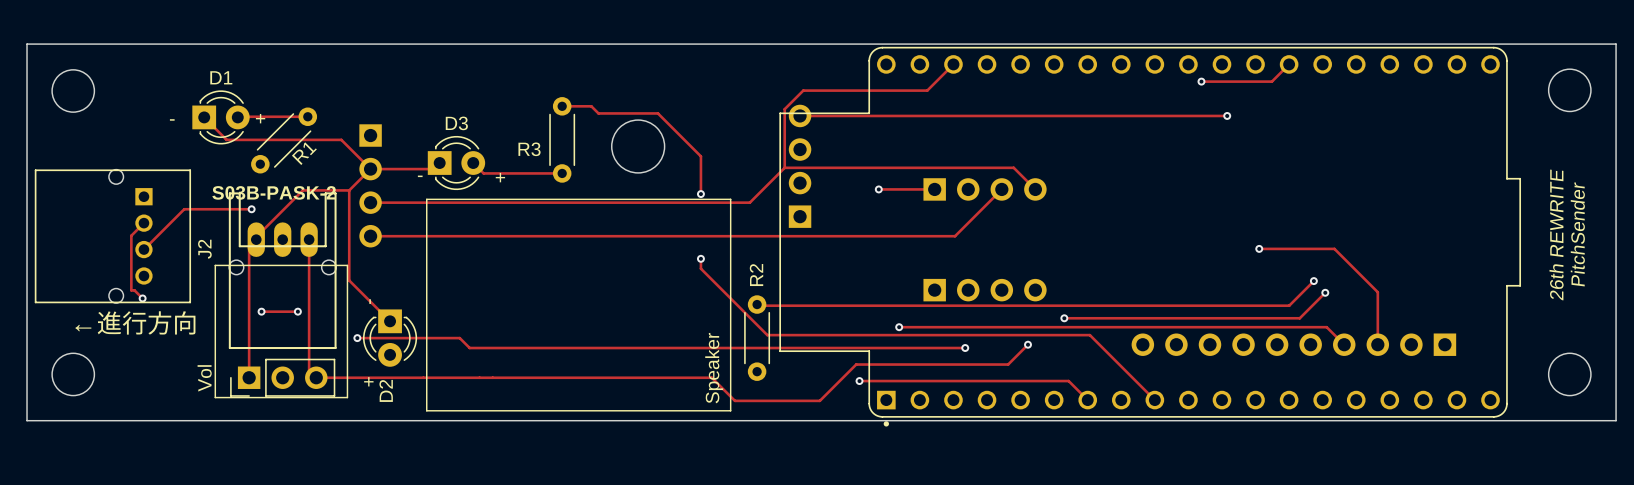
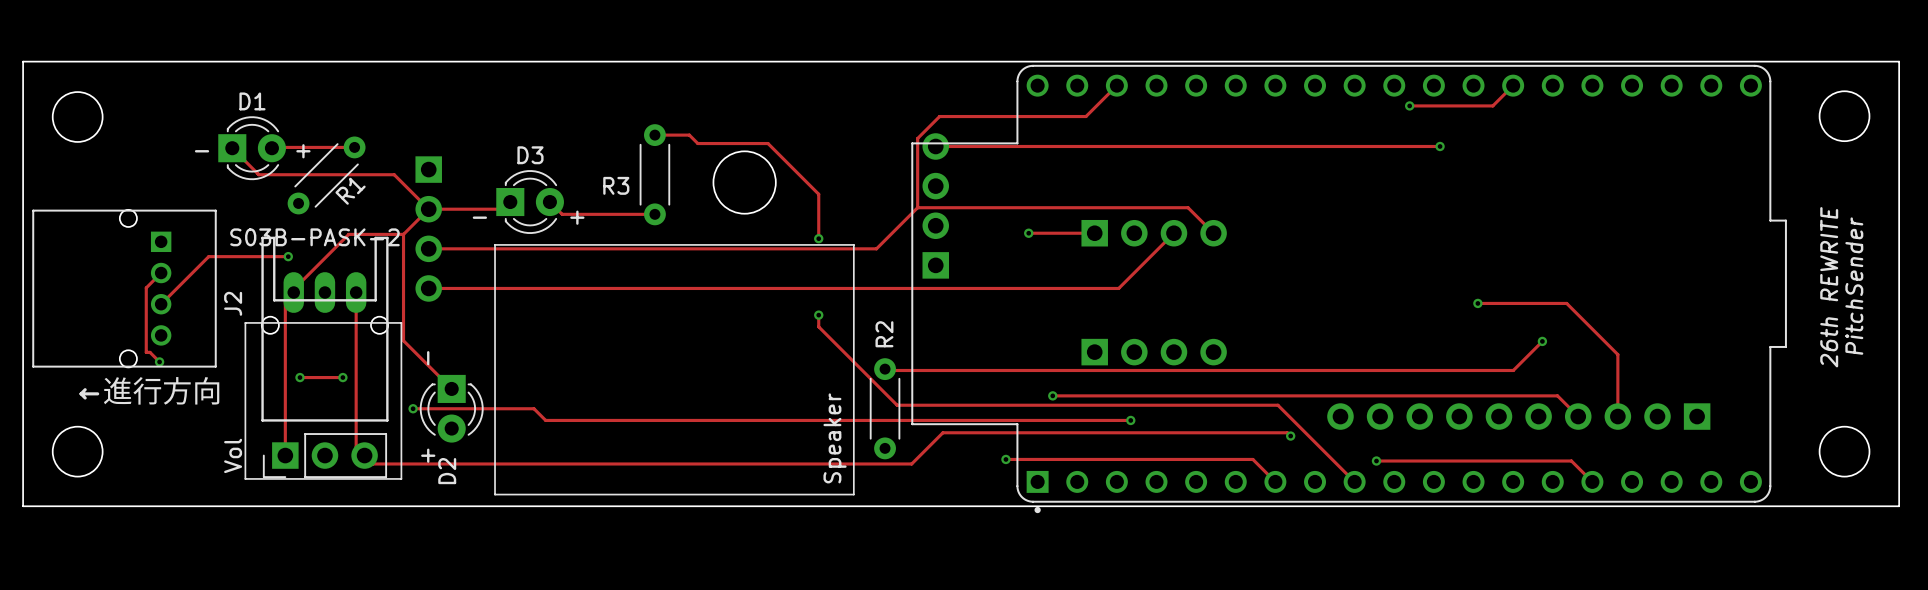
track: (1325, 292) (1299, 318) (1064, 318) -> none
via: (1325, 292) -> none
via: (1064, 318) -> none
track: (1028, 344) (1008, 364) (856, 364) (819, 400) (734, 400) (711, 377) (316, 377) -> (1290, 436) (1287, 432) (942, 432) (911, 463) (373, 463) (364, 455)
via: (1028, 344) -> none
via: none -> (1290, 436)
track: none -> (1376, 461) (1571, 461) (1592, 481)
via: none -> (1376, 461)

